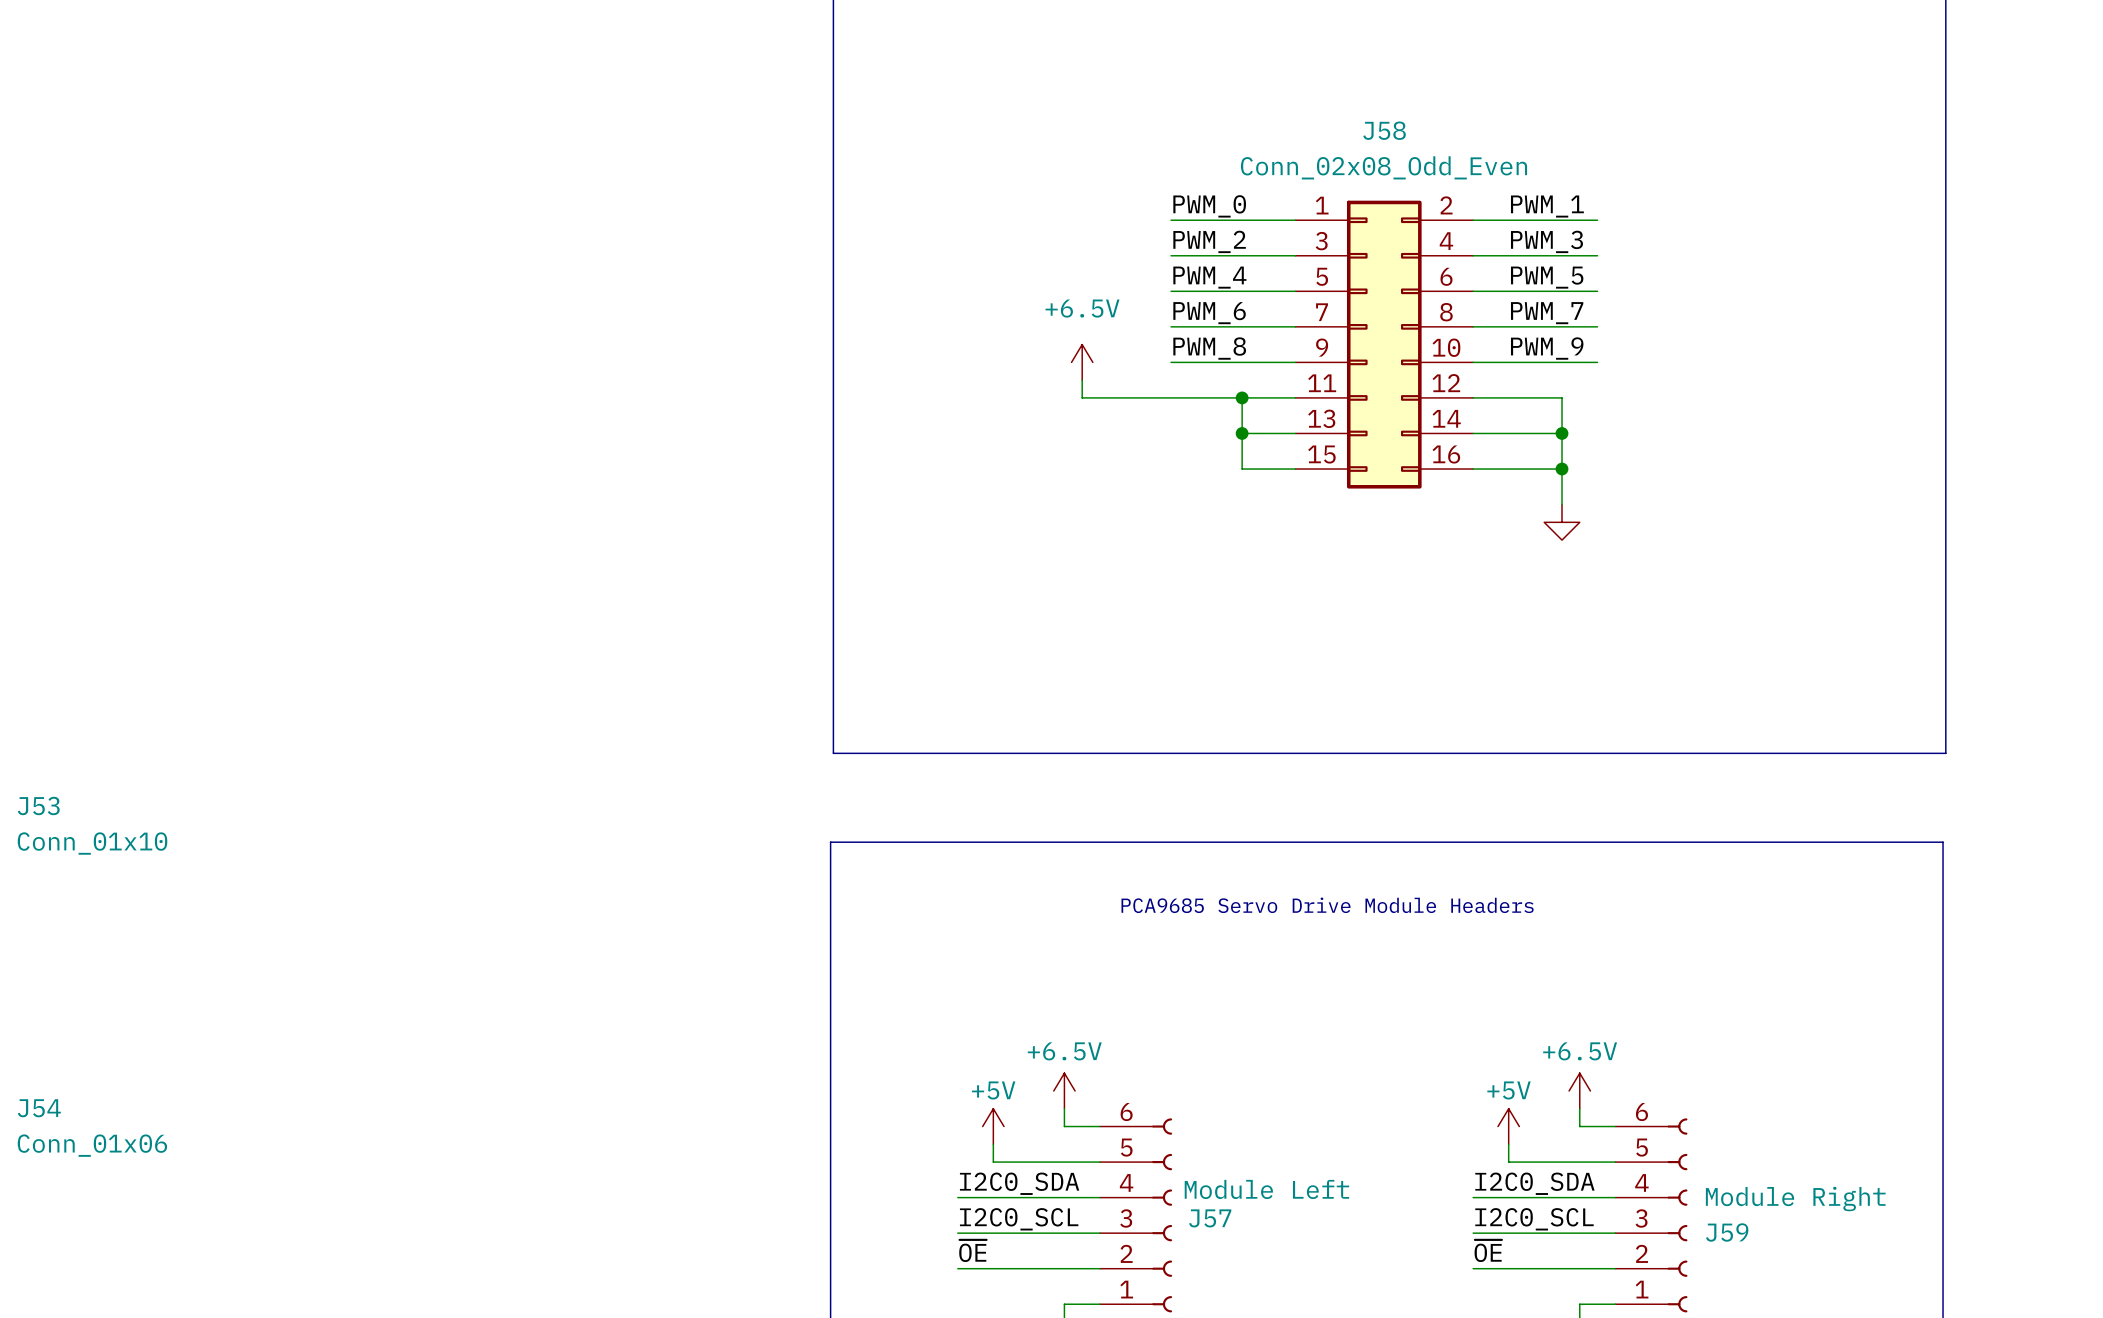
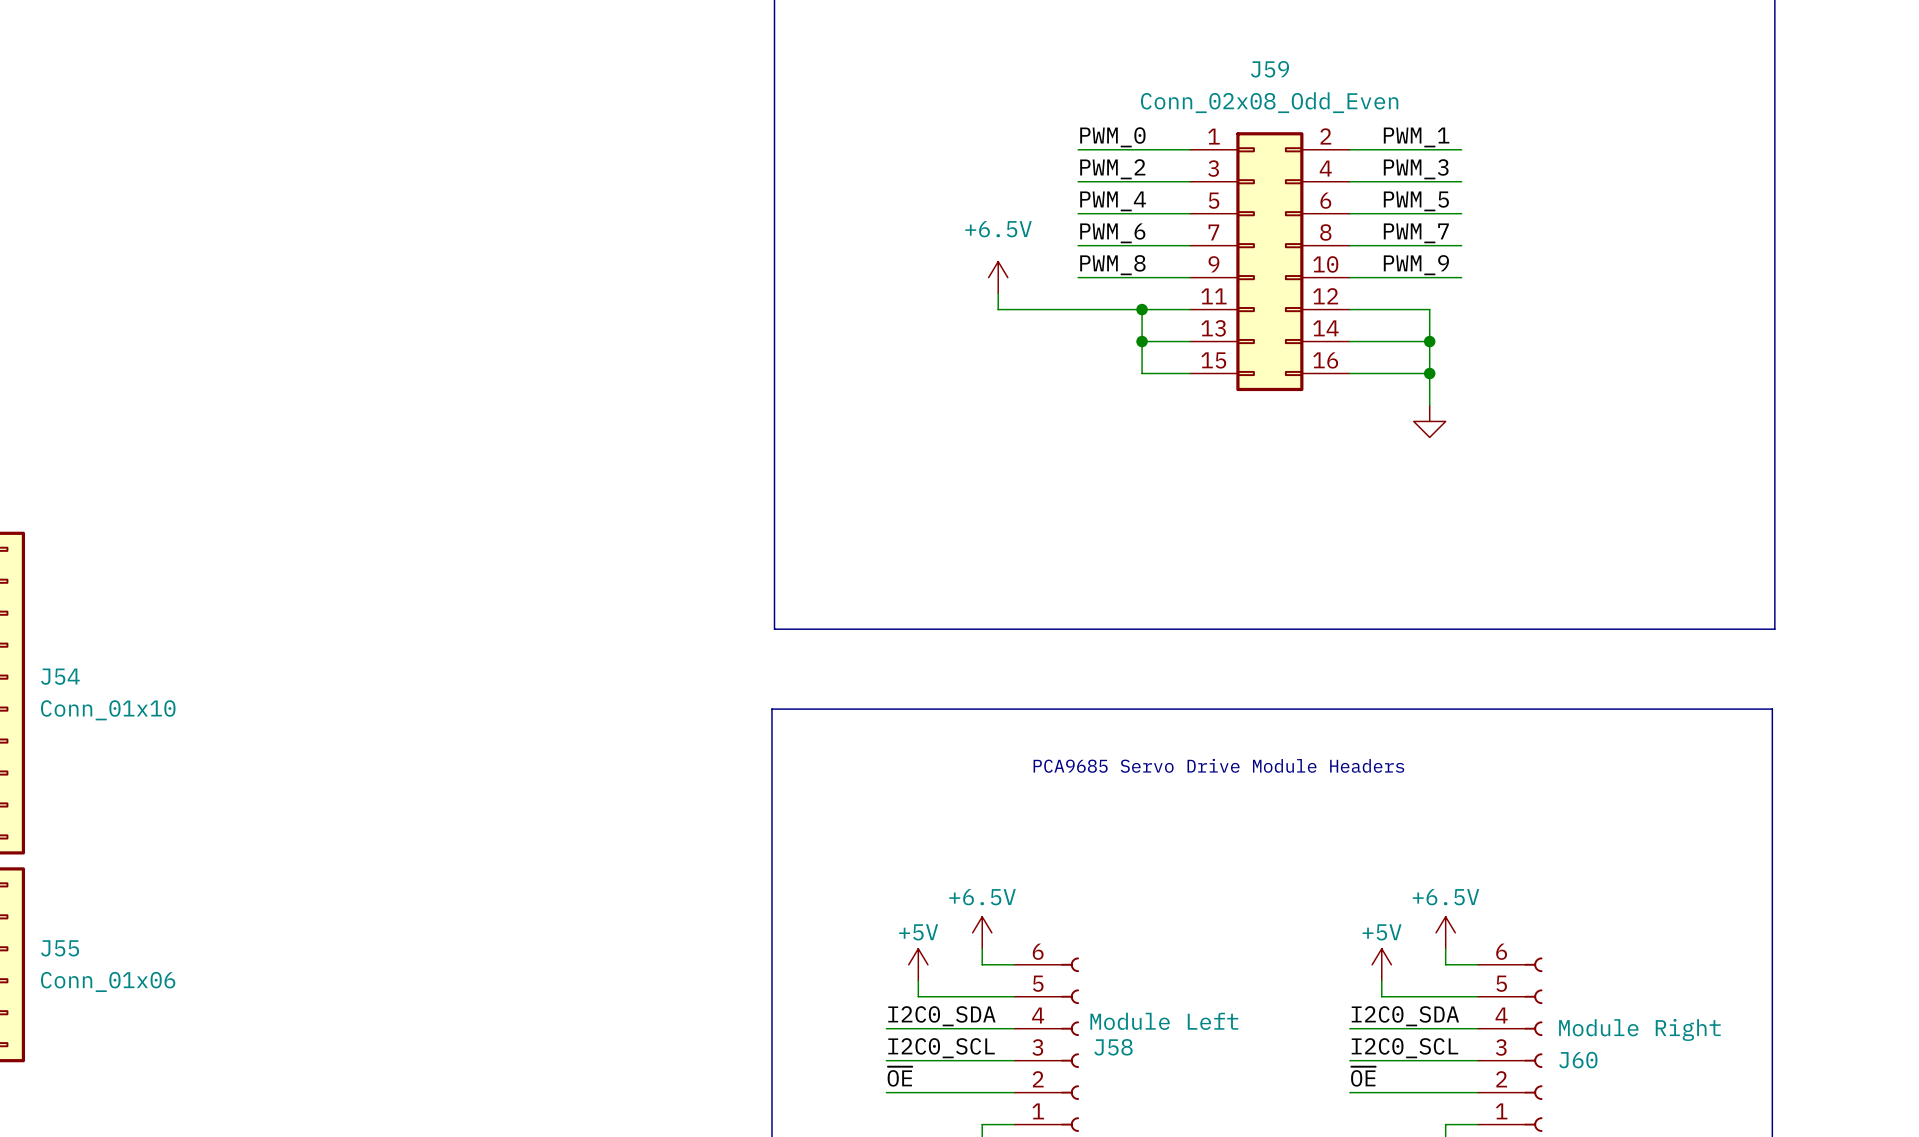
J58 name: J58 (1384, 130) -> J59 (1270, 69)
J53 name: J53 (38, 805) -> J54 (60, 676)
J54 name: J54 (39, 1108) -> J55 (60, 948)
J57 name: J57 (1210, 1218) -> J58 (1113, 1047)
J59 name: J59 (1727, 1232) -> J60 (1578, 1060)

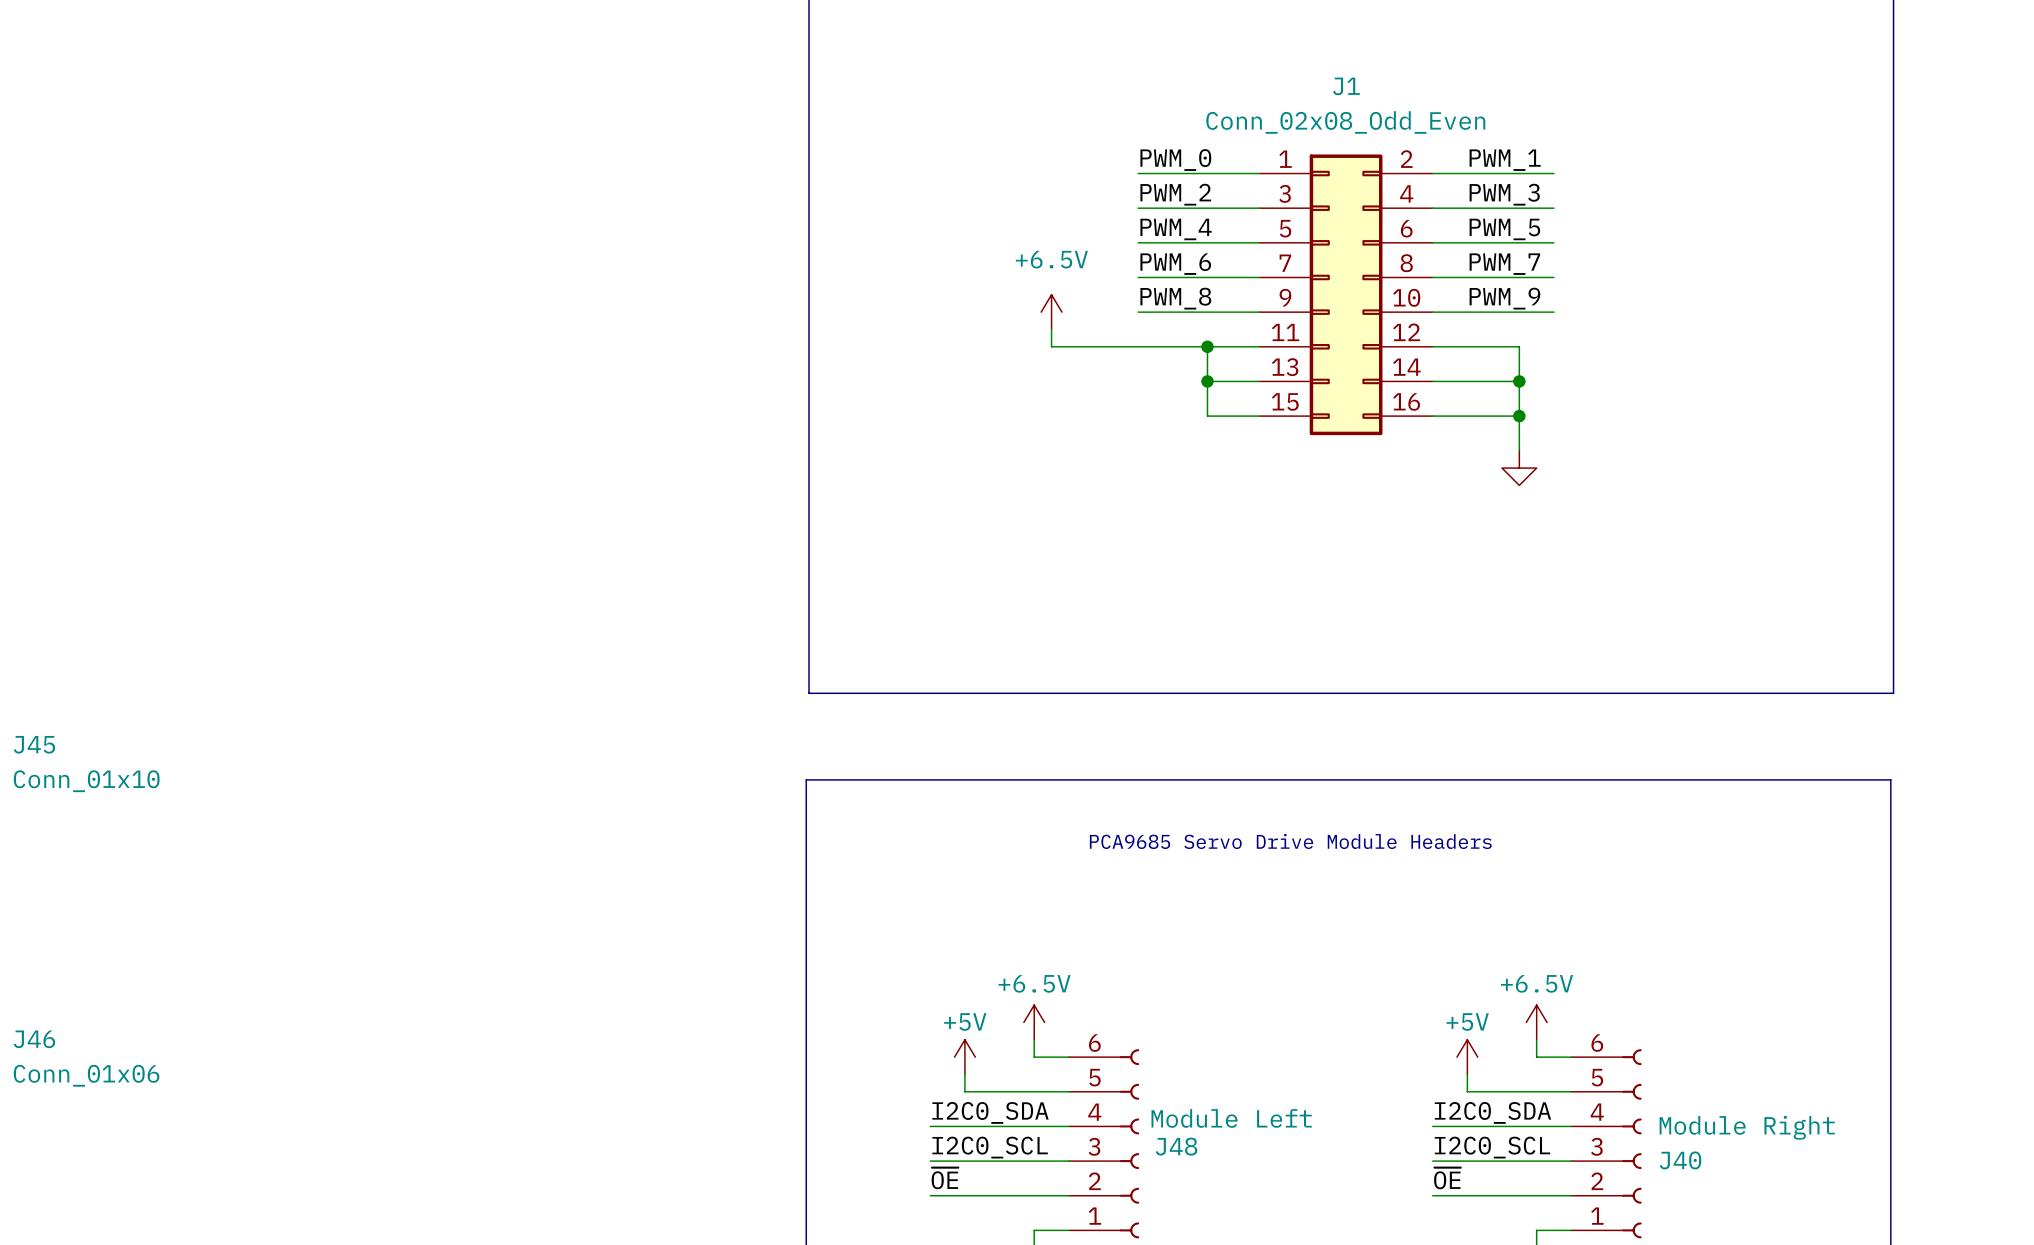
J59 name: J59 (1270, 69) -> J1 (1346, 86)
J54 name: J54 (60, 676) -> J45 (34, 744)
J55 name: J55 (60, 948) -> J46 (34, 1039)
J58 name: J58 (1113, 1047) -> J48 (1176, 1146)
J60 name: J60 (1578, 1060) -> J40 (1680, 1160)

